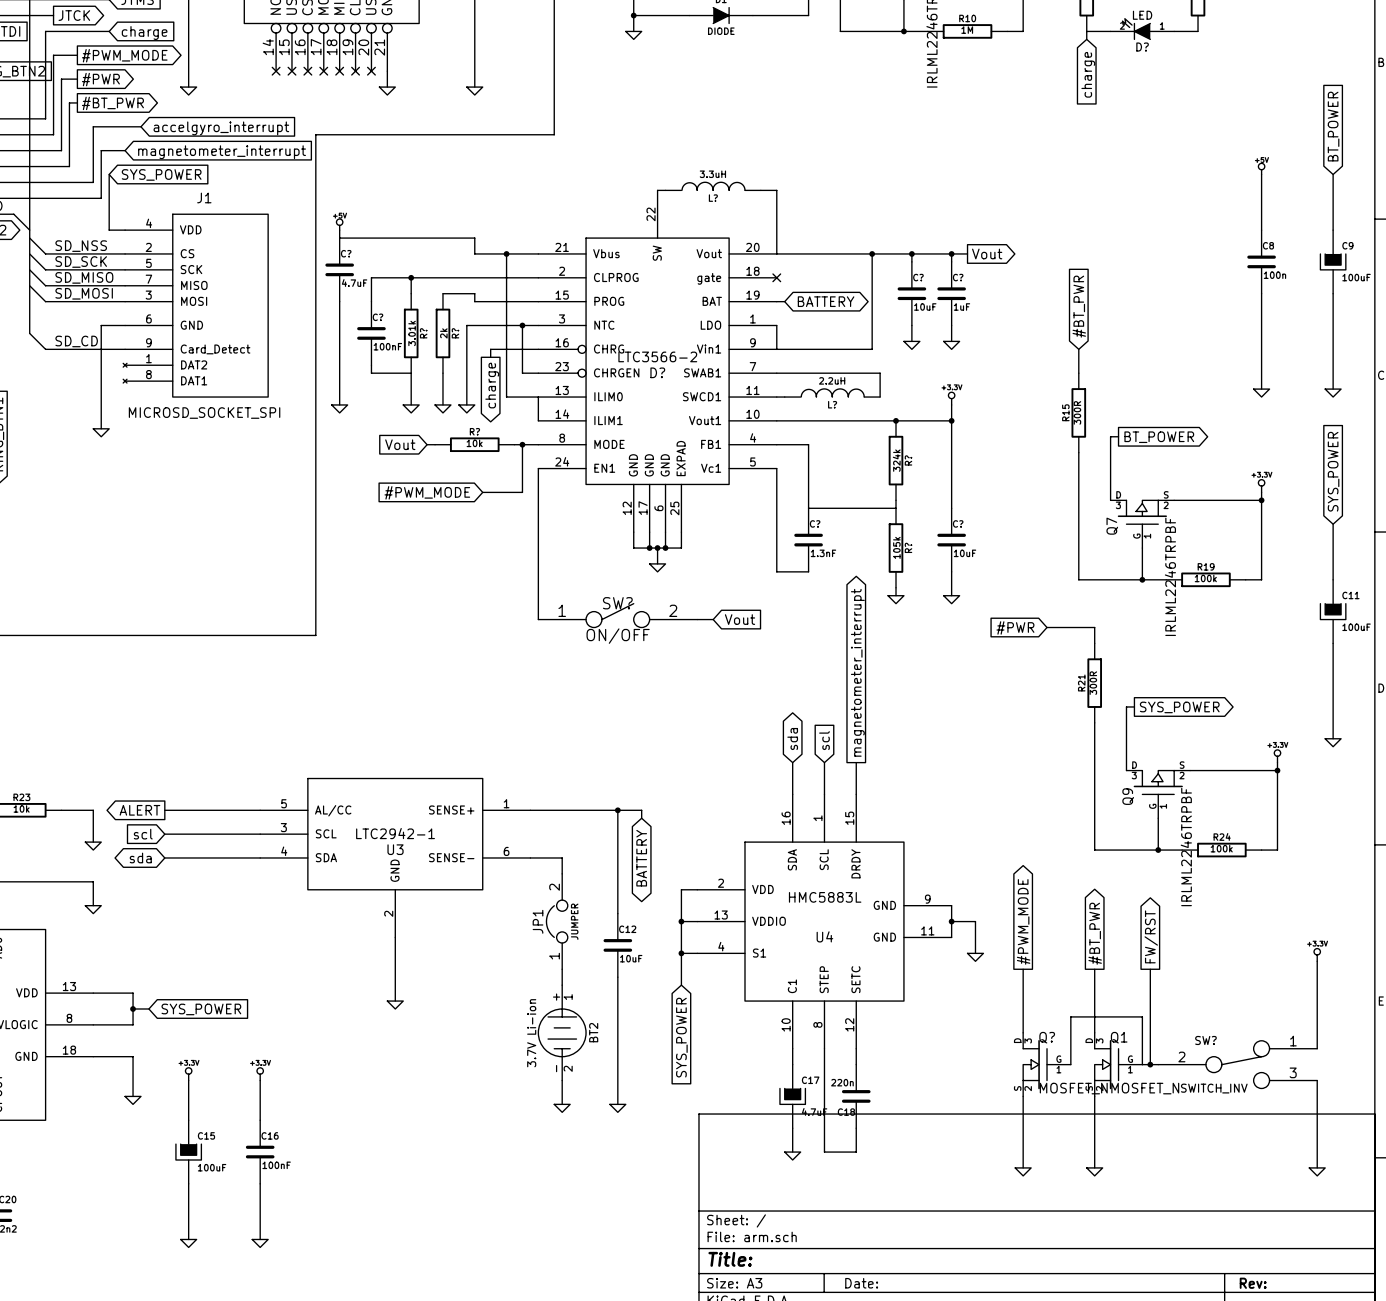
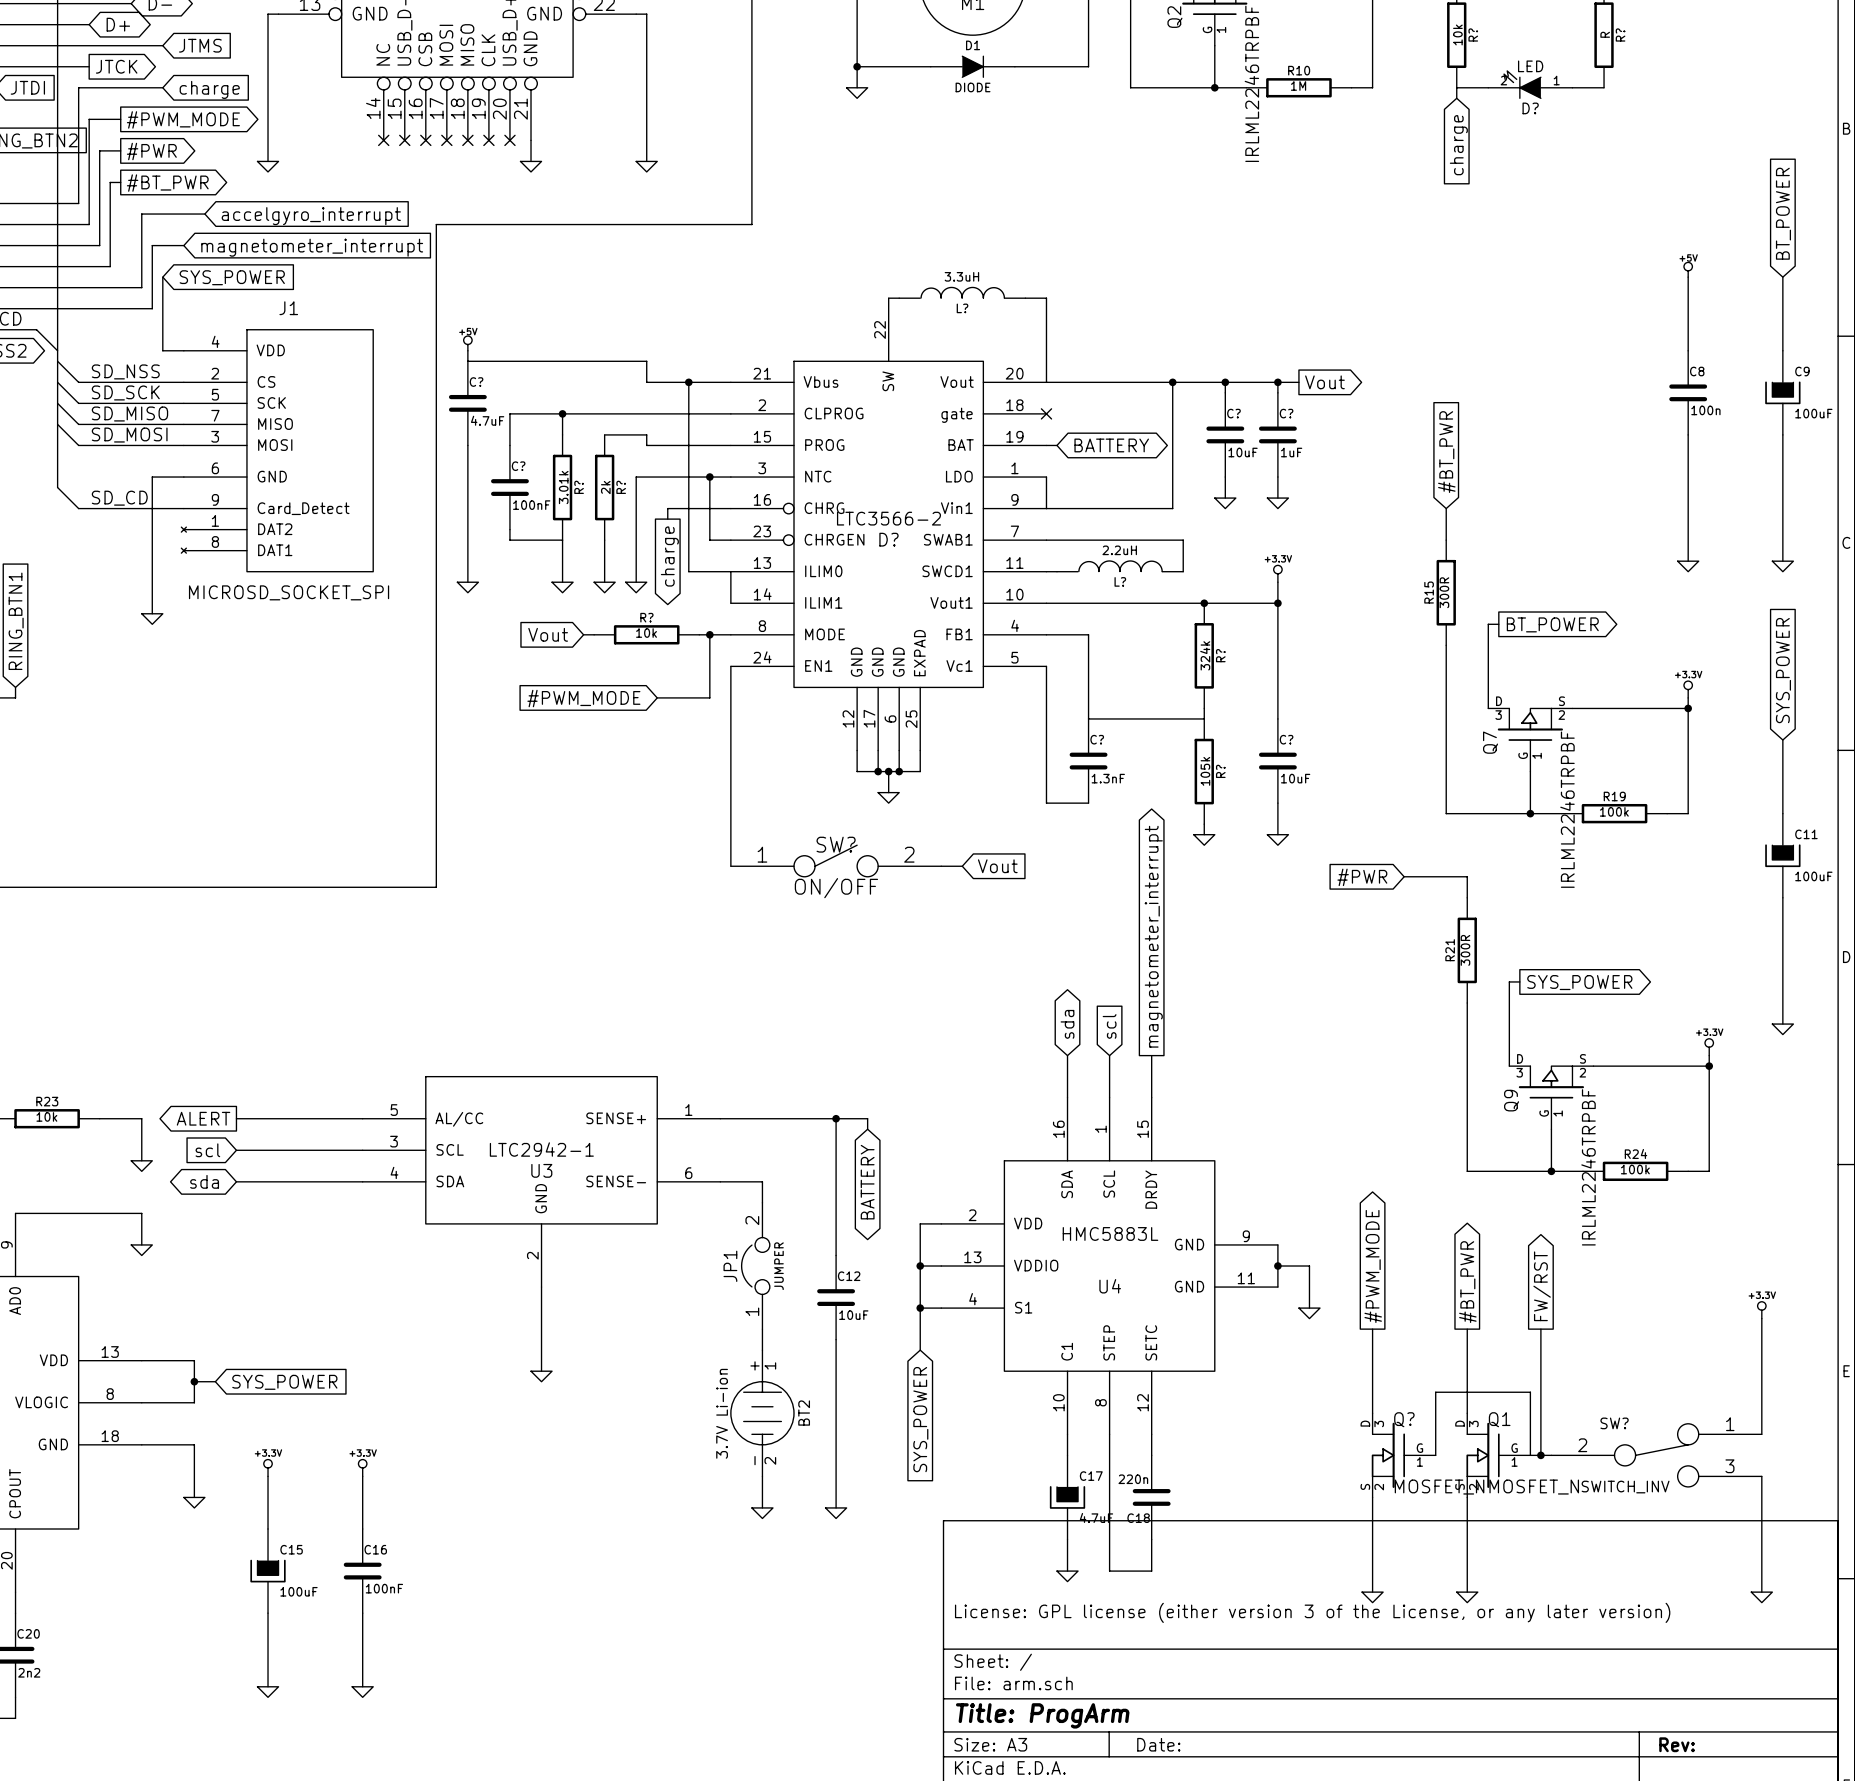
title block: none -> License: GPL license (either version 3 of the License, or any later version) (1312, 1612)
title block: Title: (730, 1259) -> Title: ProgArm (1042, 1715)

